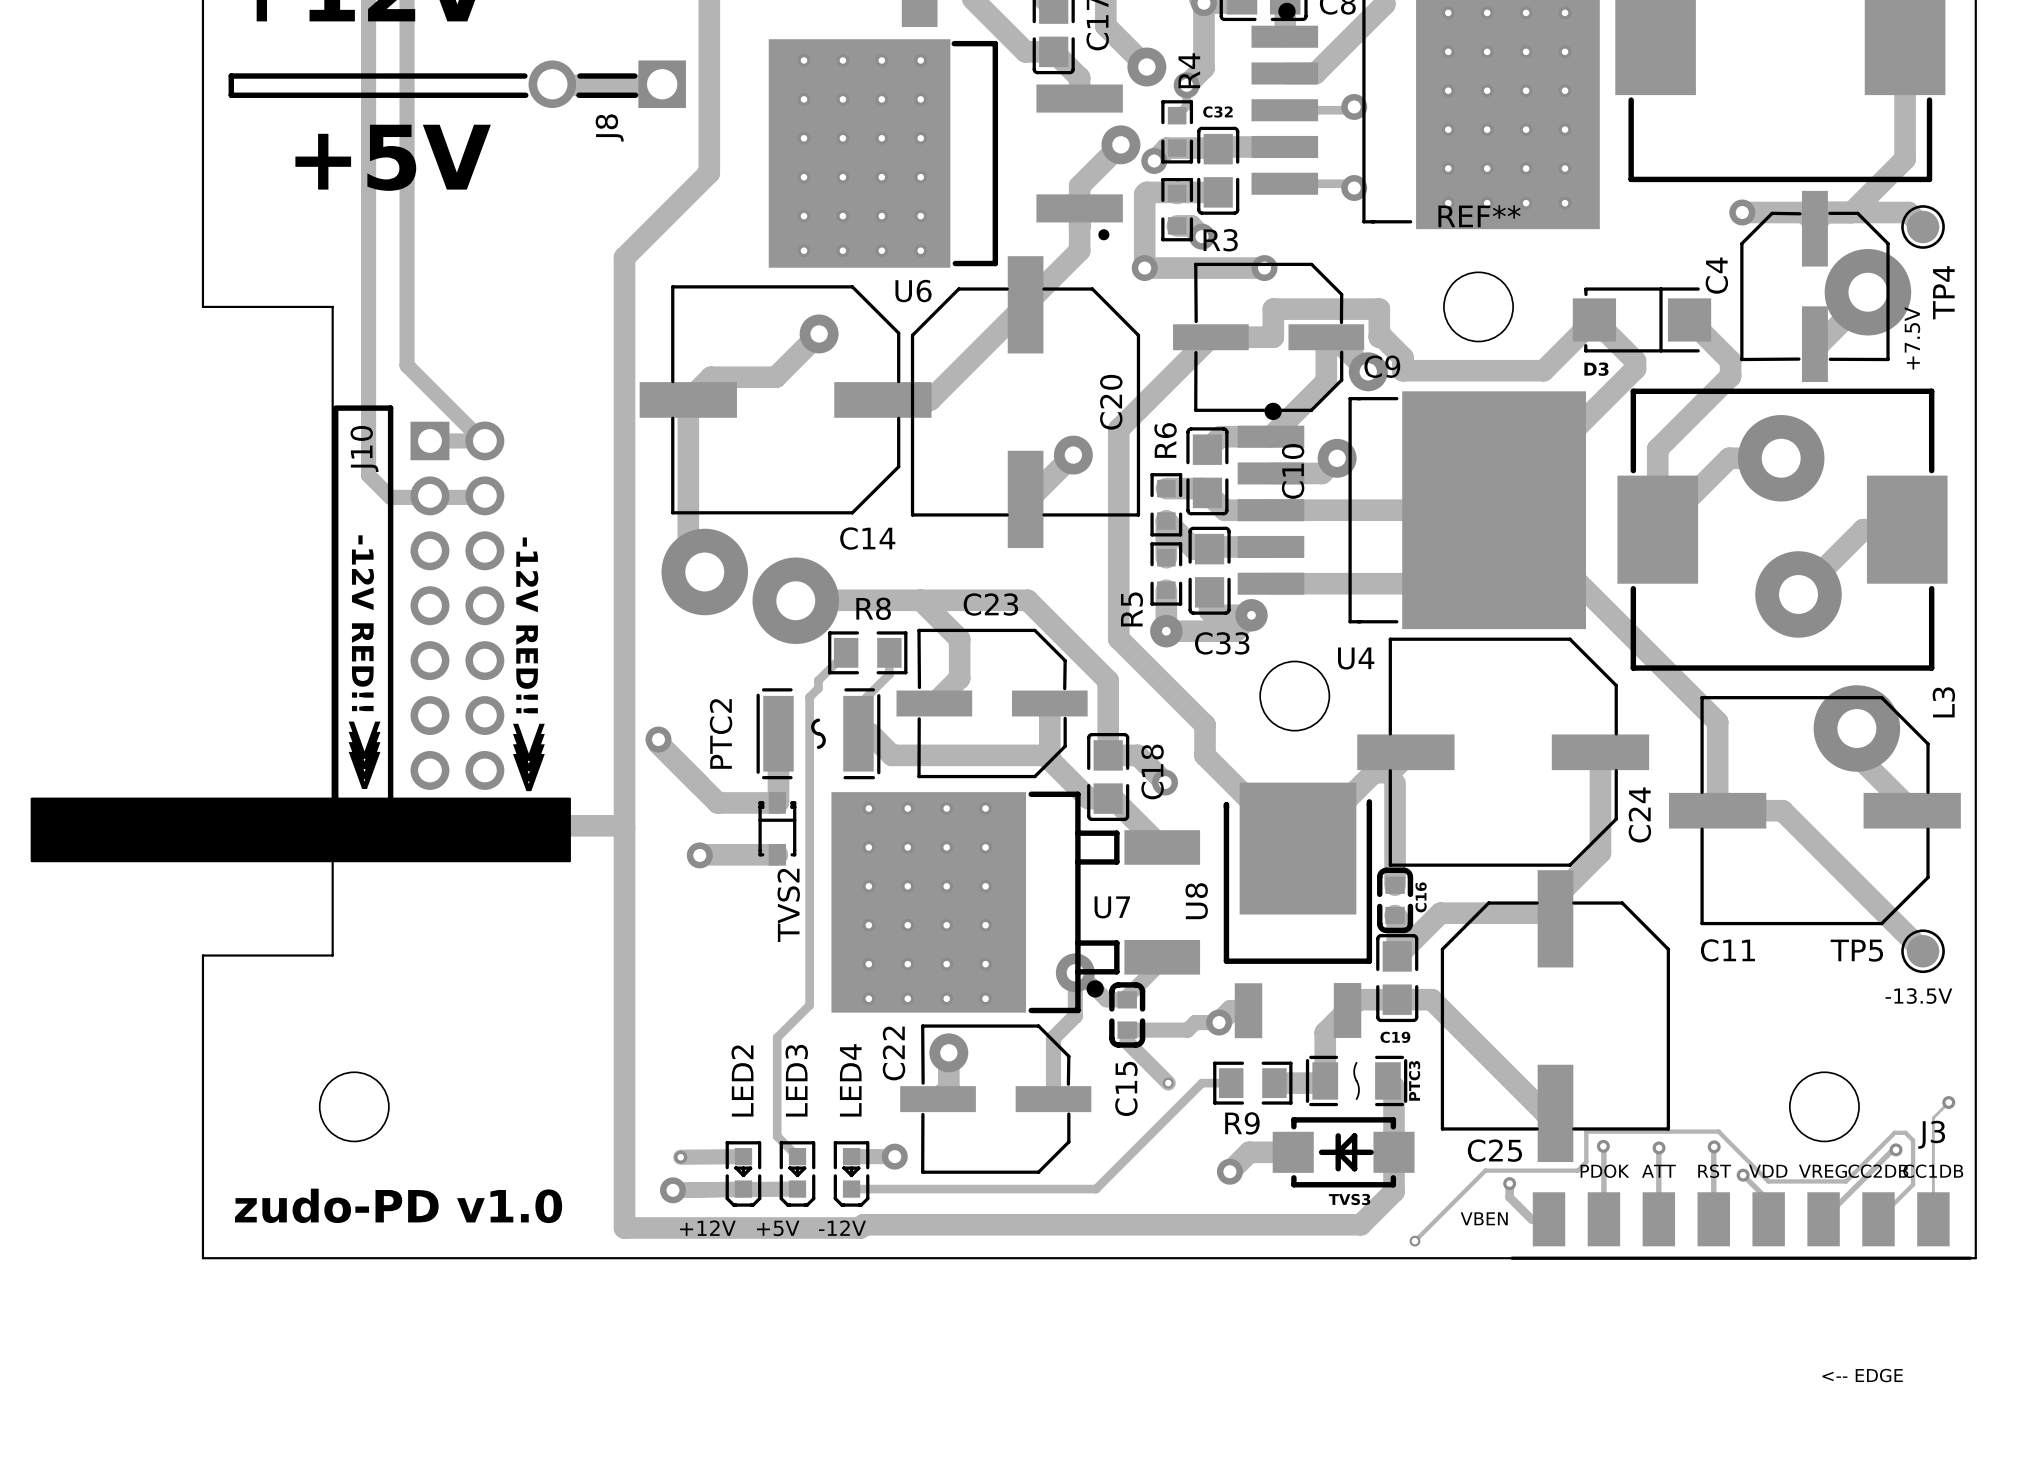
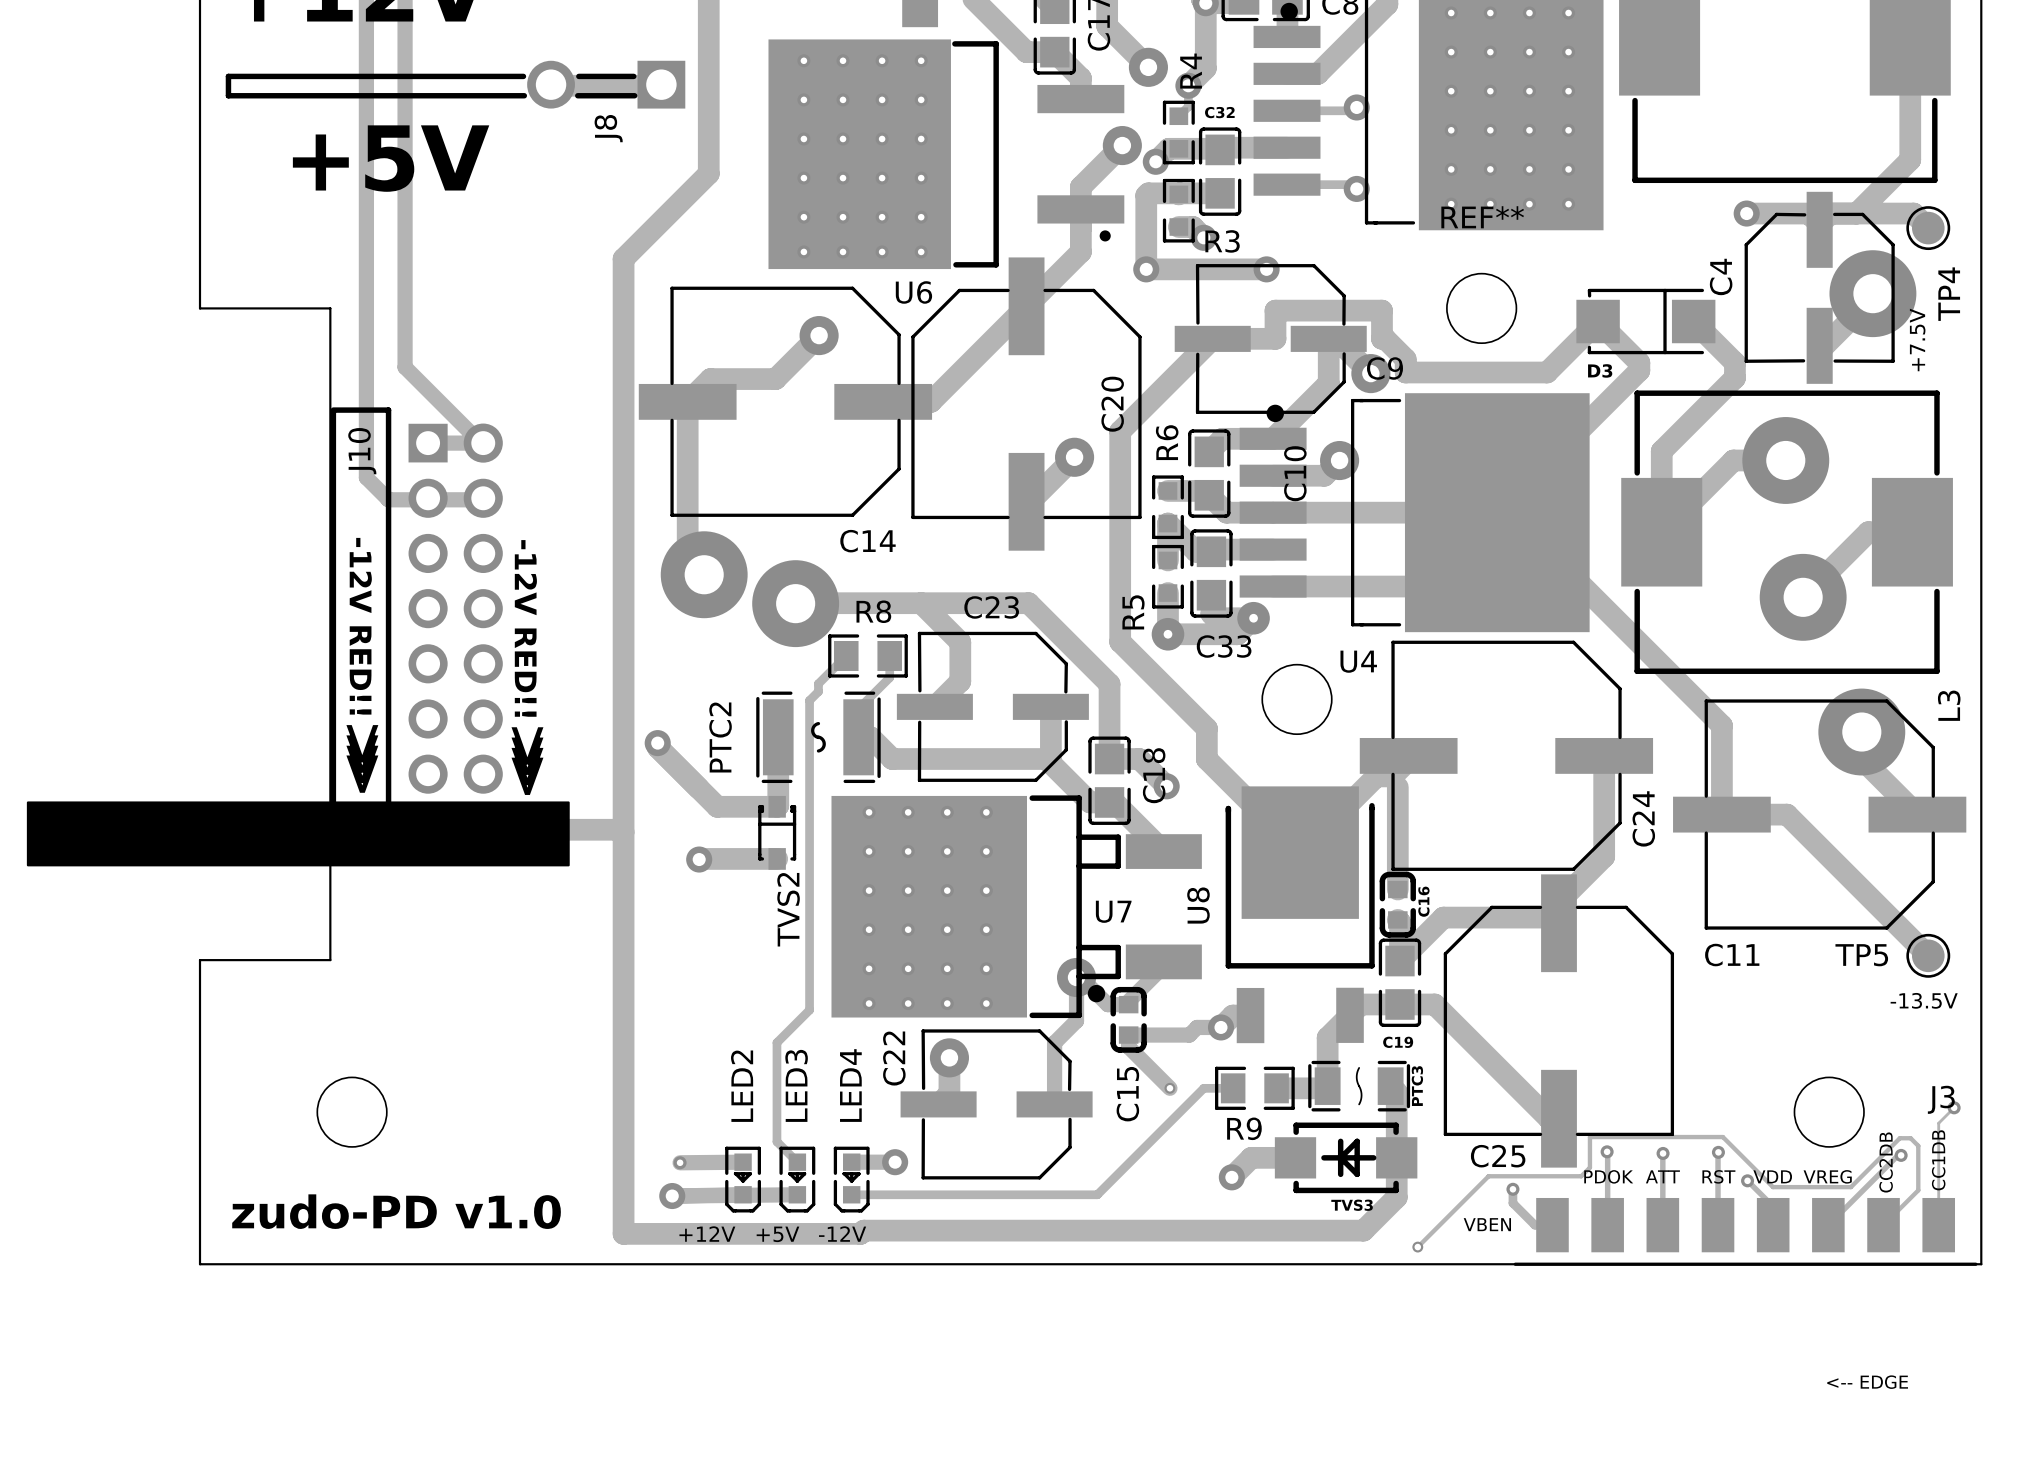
J3 name position: J3 (1931, 1134) -> J3 (1941, 1099)
J3 text rotation: 0° (1878, 1171) -> 90° counterclockwise (1886, 1162)
J3 text rotation: 0° (1933, 1171) -> 90° counterclockwise (1938, 1160)

